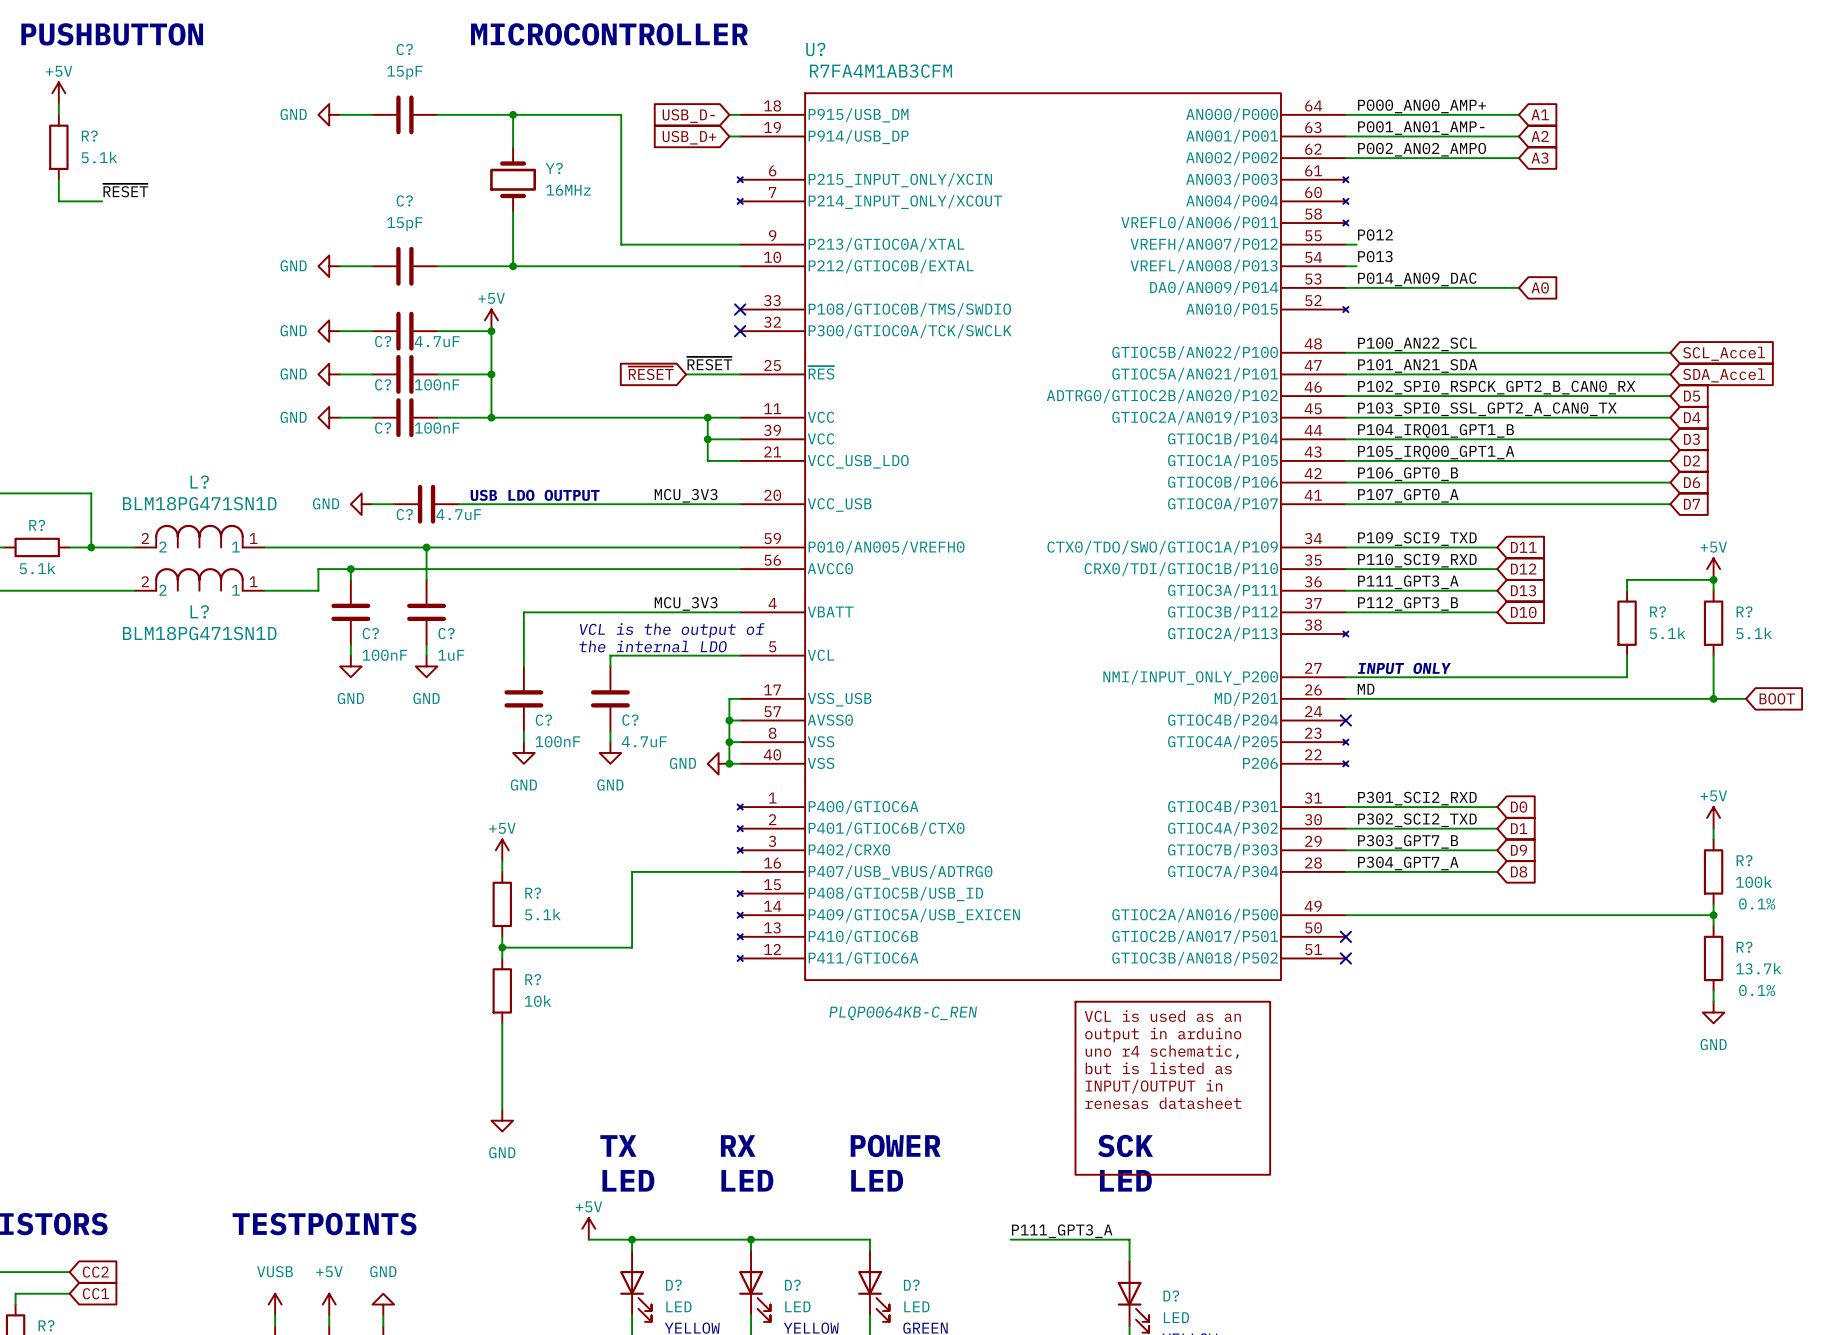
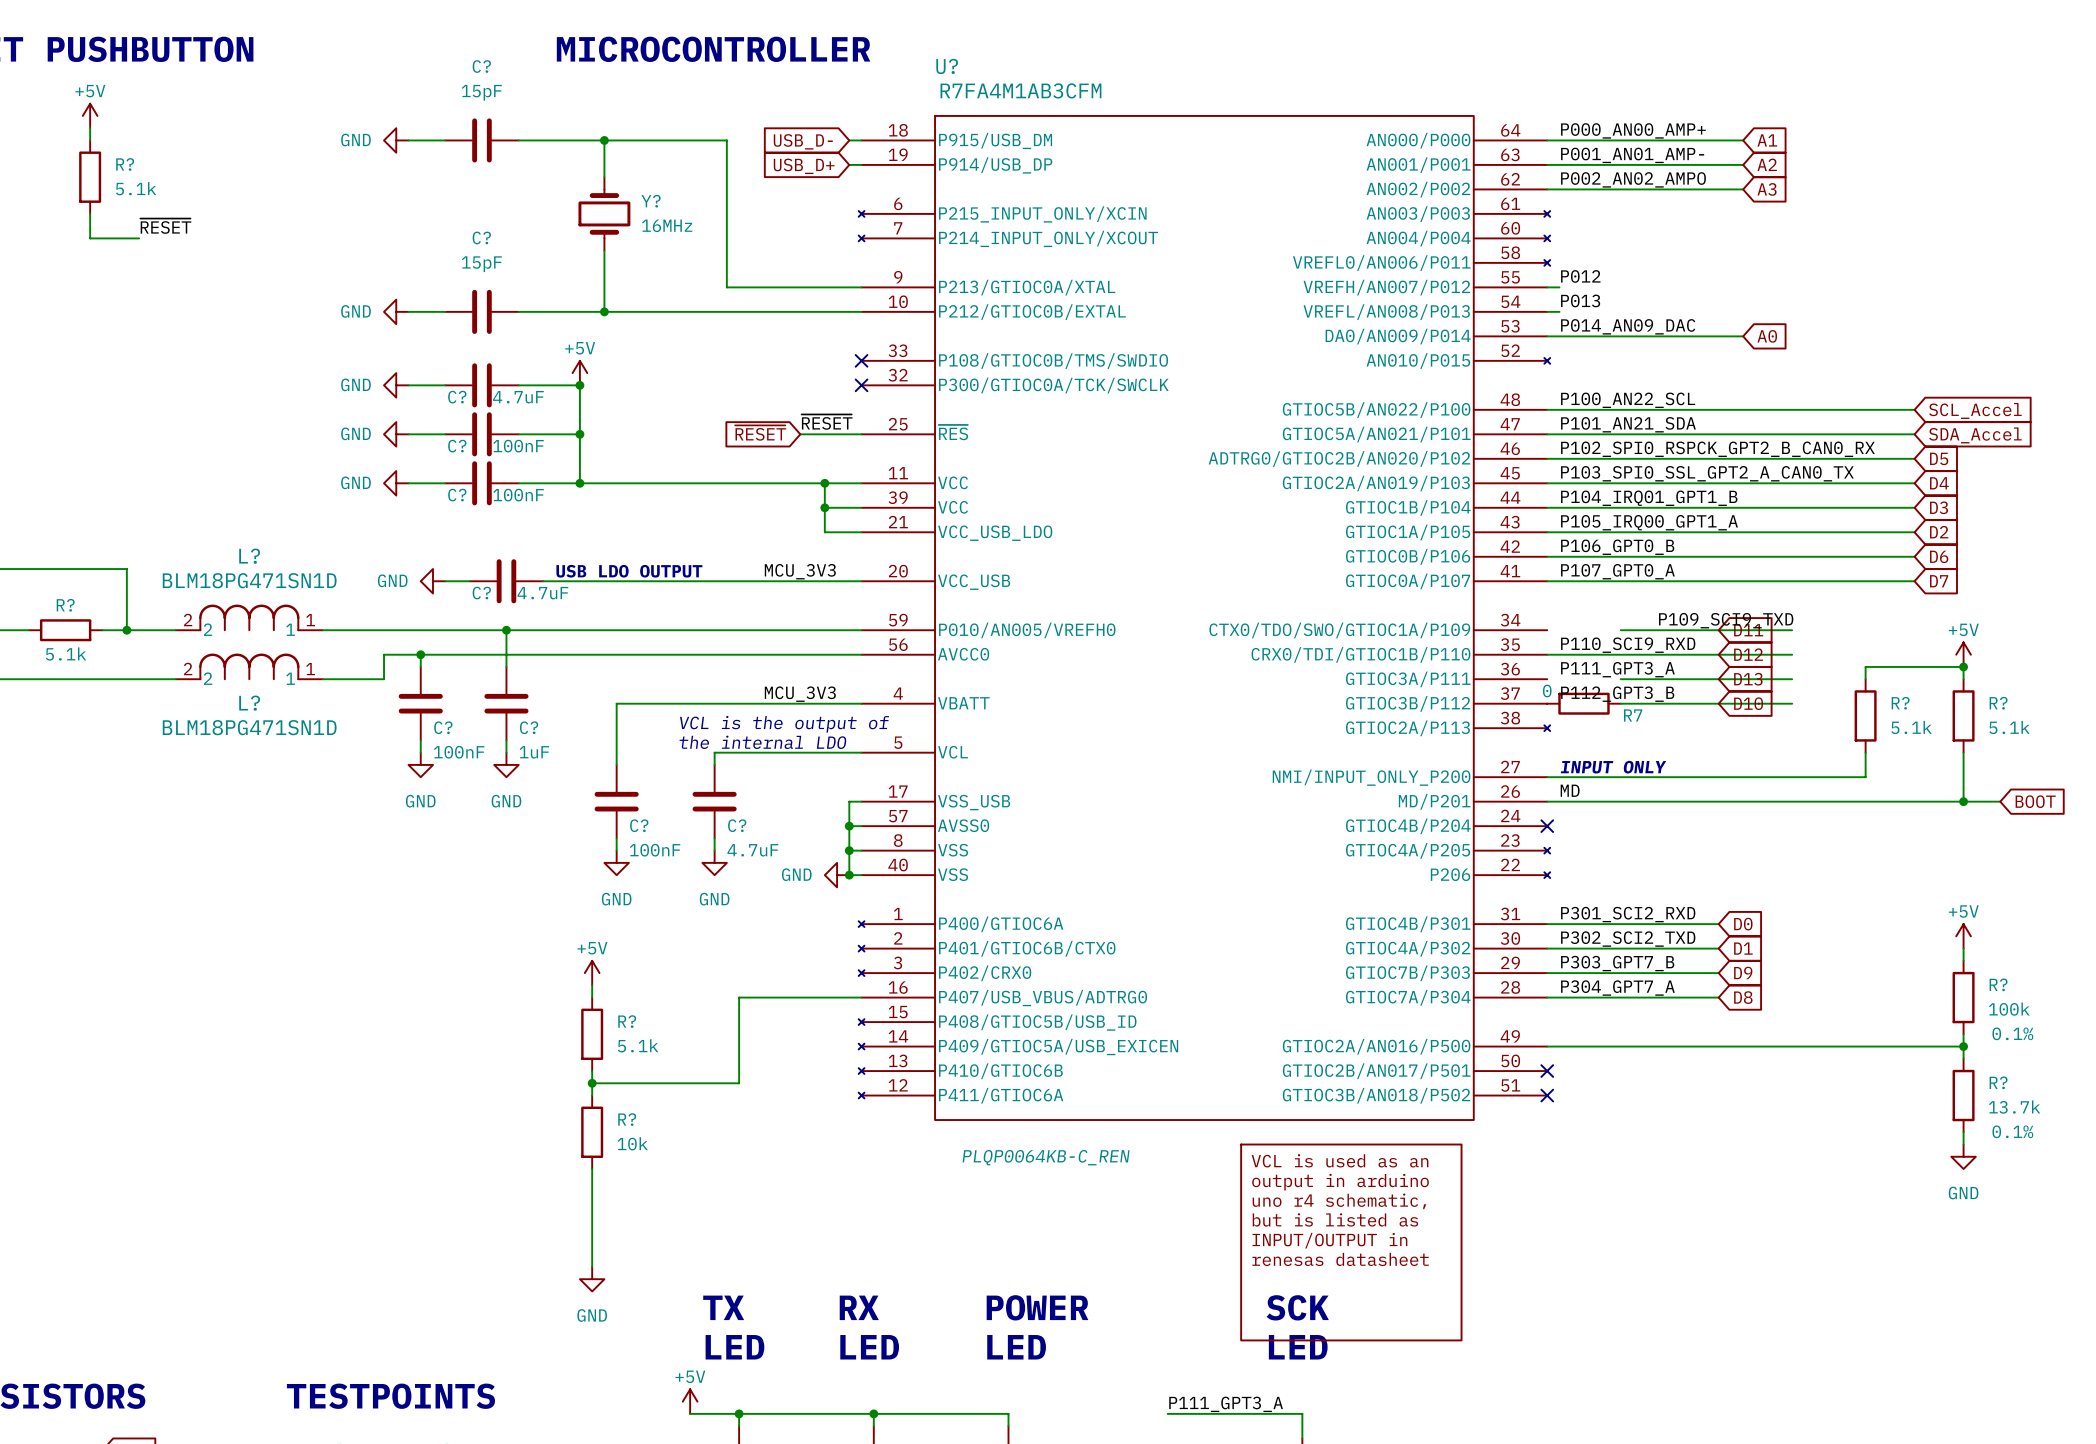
label position: P109_SCI9_TXD (1417, 539) -> P109_SCI9_TXD (1726, 620)
wire: (1345, 547) (1410, 547) -> (1718, 630) (1792, 630)
wire: none -> (1718, 654) (1792, 654)
wire: (1345, 590) (1410, 590) -> (1718, 679) (1792, 679)
wire: (1345, 612) (1410, 612) -> (1718, 703) (1792, 703)
R7: none -> 0 (1583, 703)

